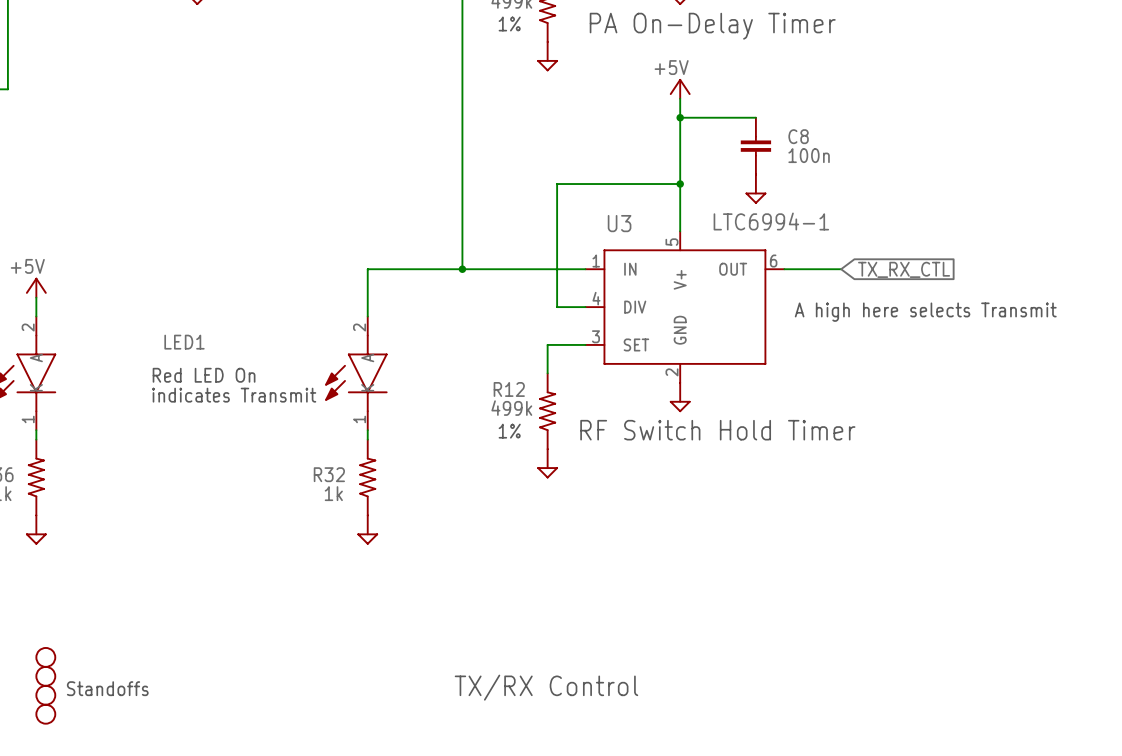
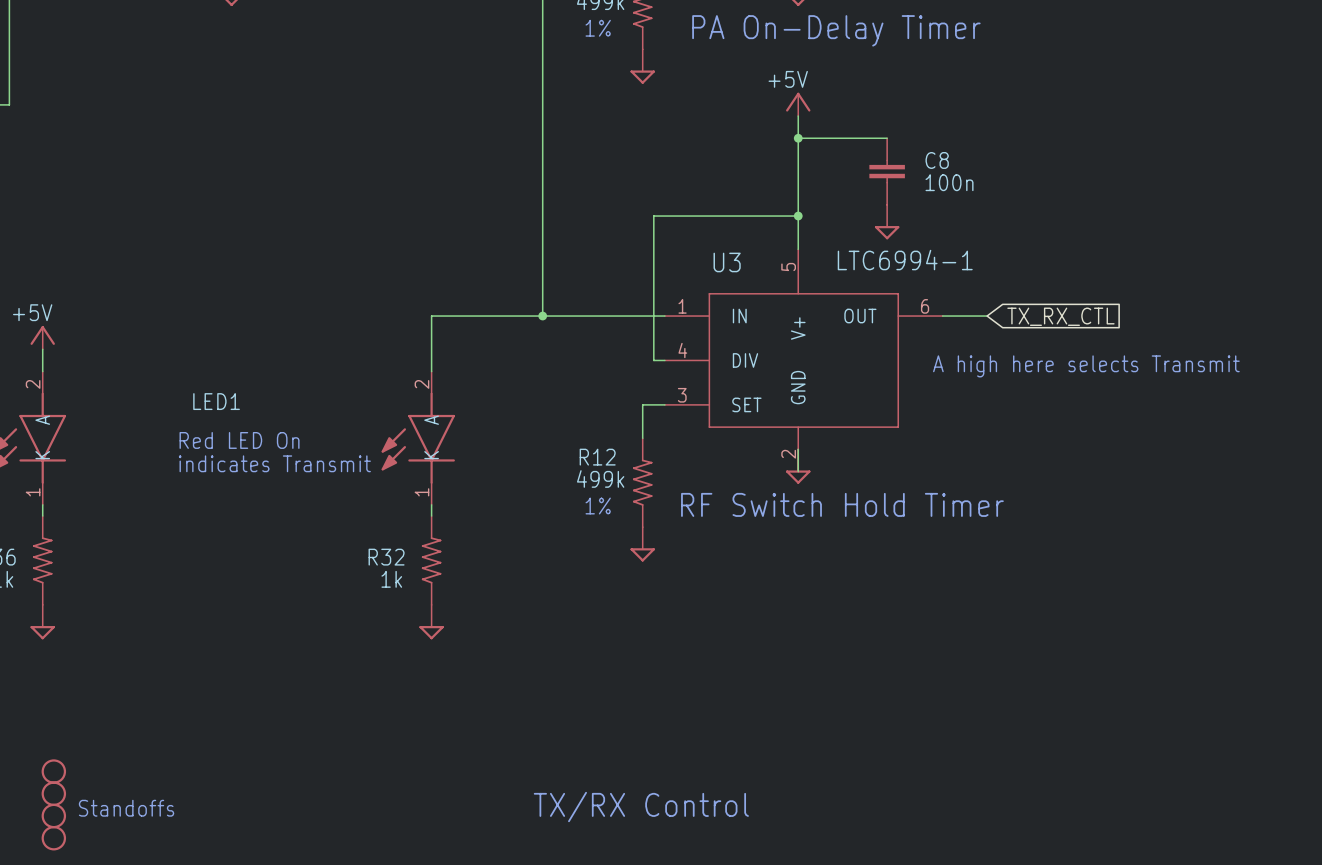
U3 symbol: [585, 231, 785, 383] -> [664, 249, 943, 472]

